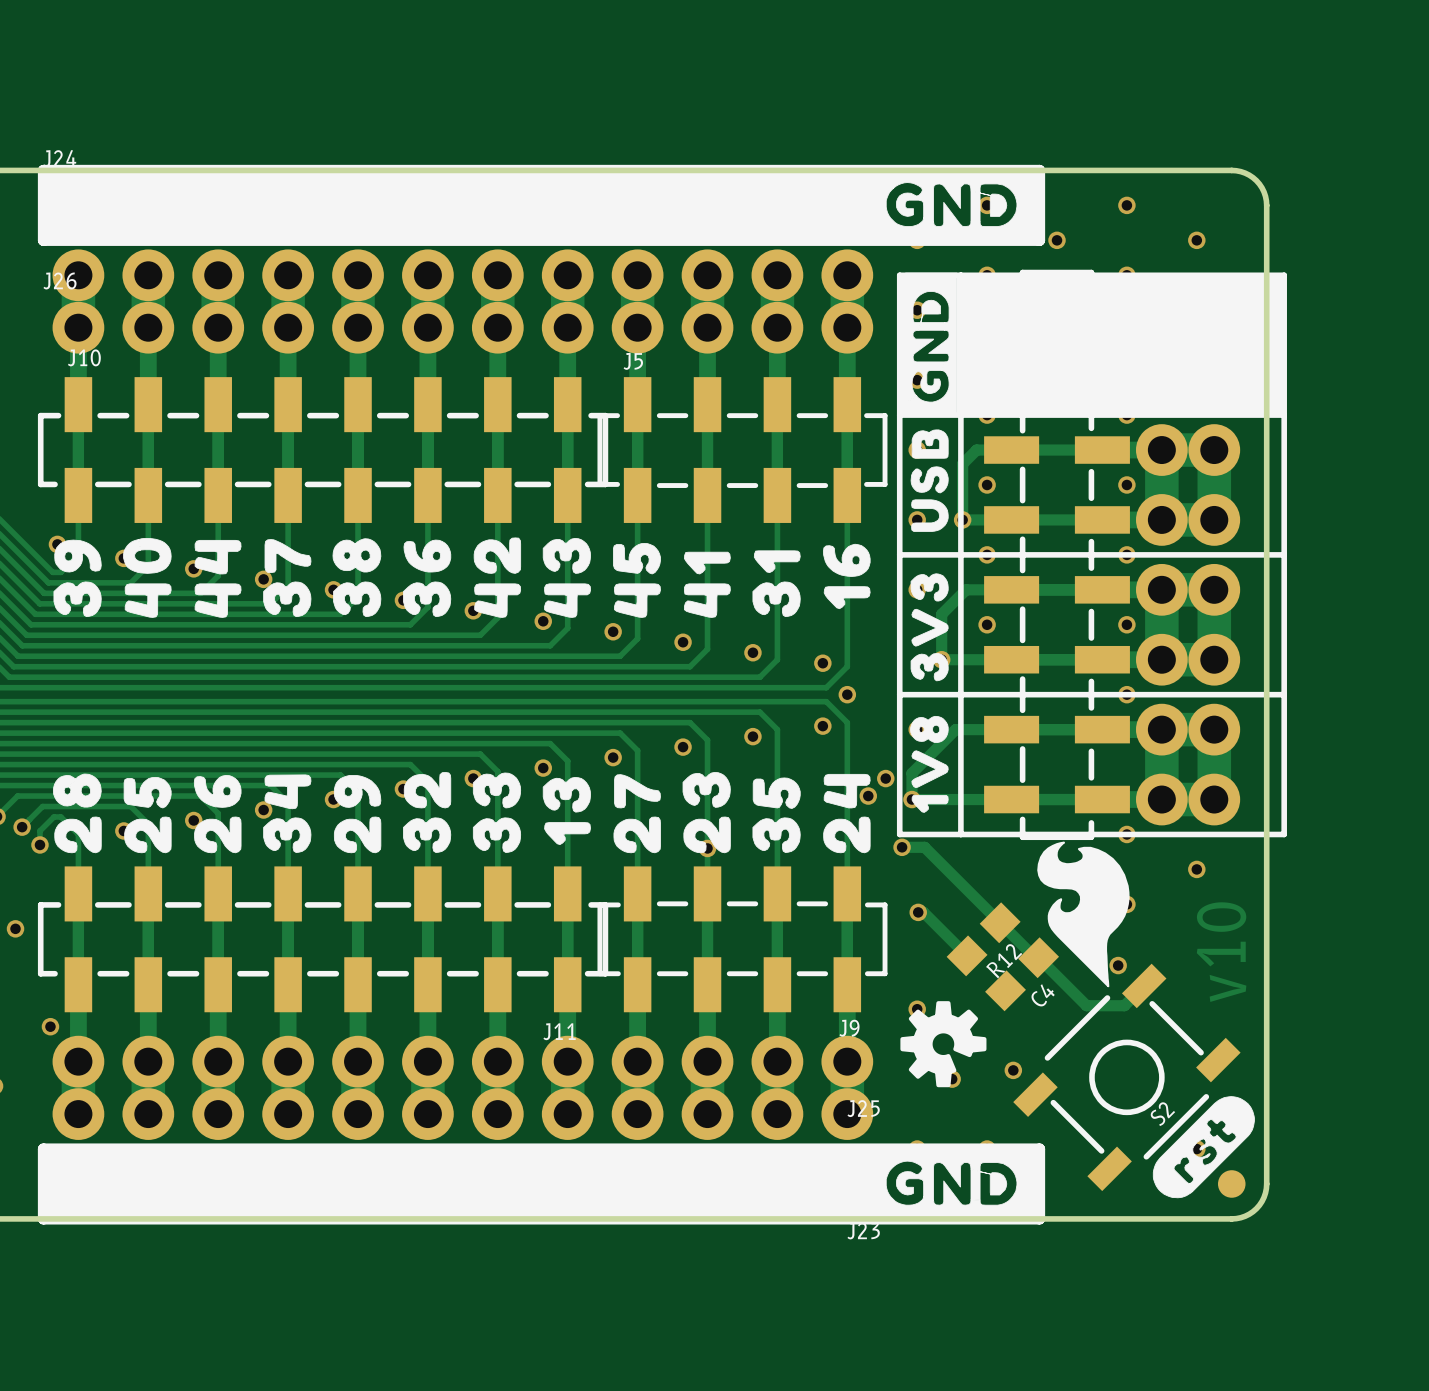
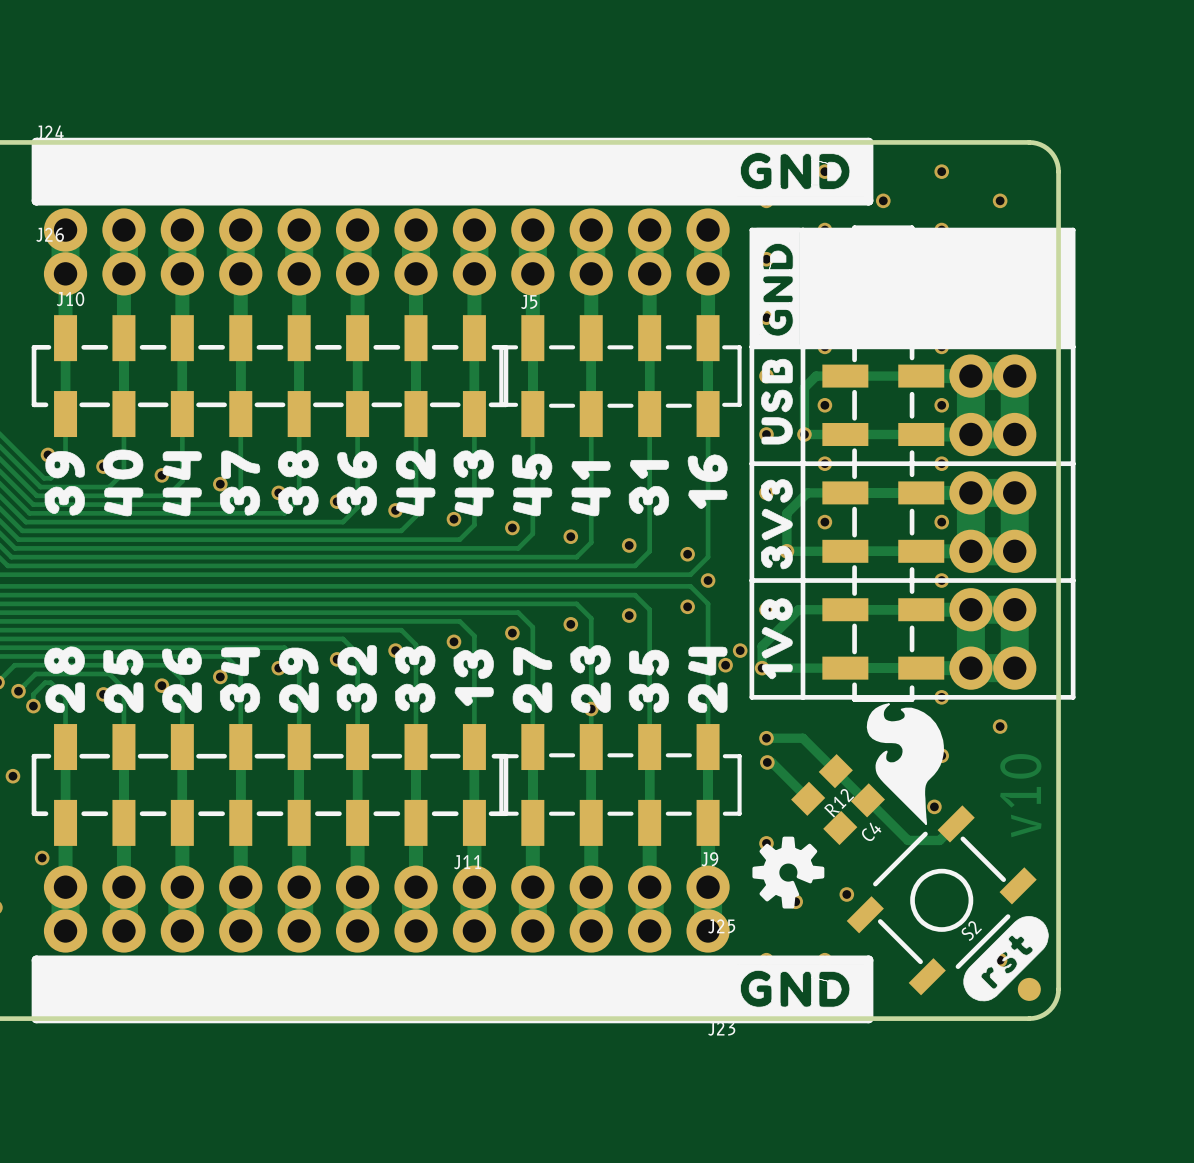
track: (902, 847) (924, 847) (960, 883) -> (766, 738) (802, 738)
via position: (902, 847) -> (766, 738)

